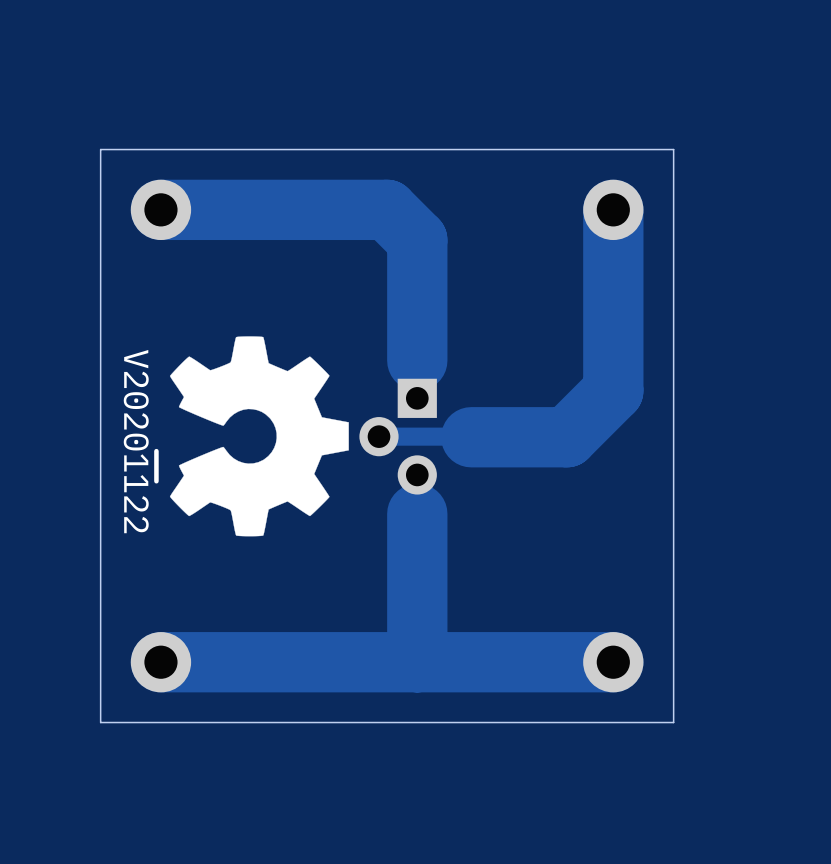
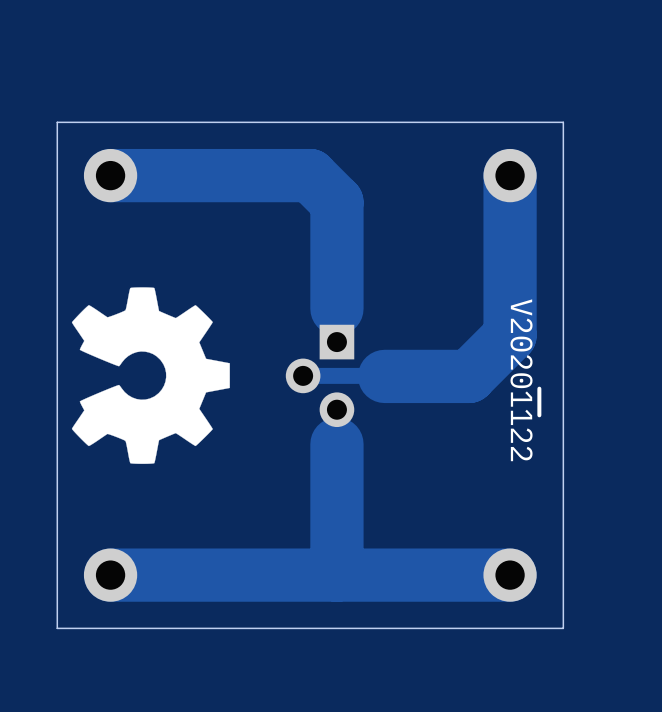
drawing position: (259, 436) -> (150, 375)
drawing position: (156, 466) -> (539, 401)

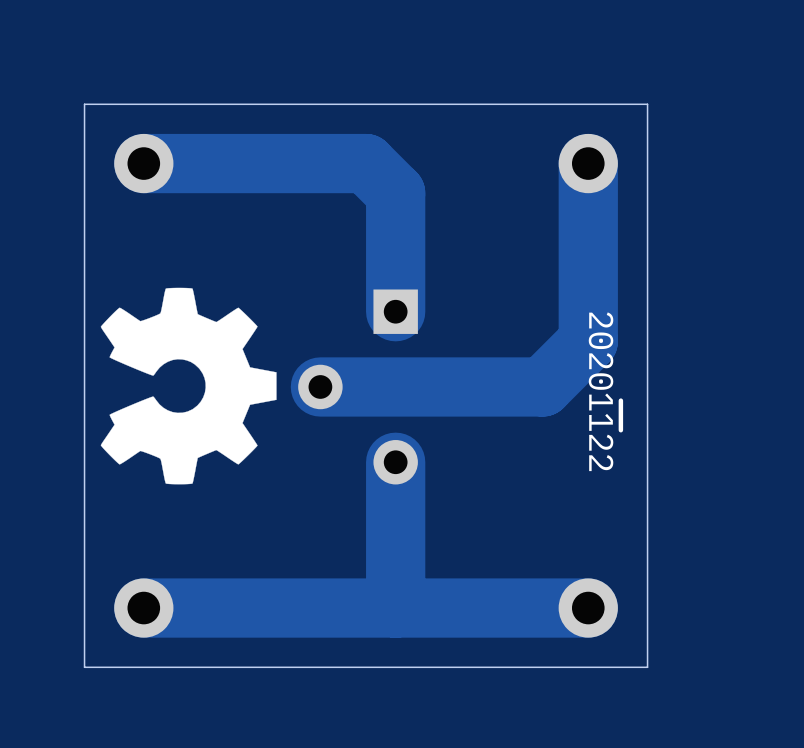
drawing shape: [510, 299, 542, 462] -> [588, 312, 624, 472]
part footprint: [285, 324, 355, 428] -> [298, 289, 418, 485]
track: (303, 375) (384, 376) -> (320, 386) (448, 386)

